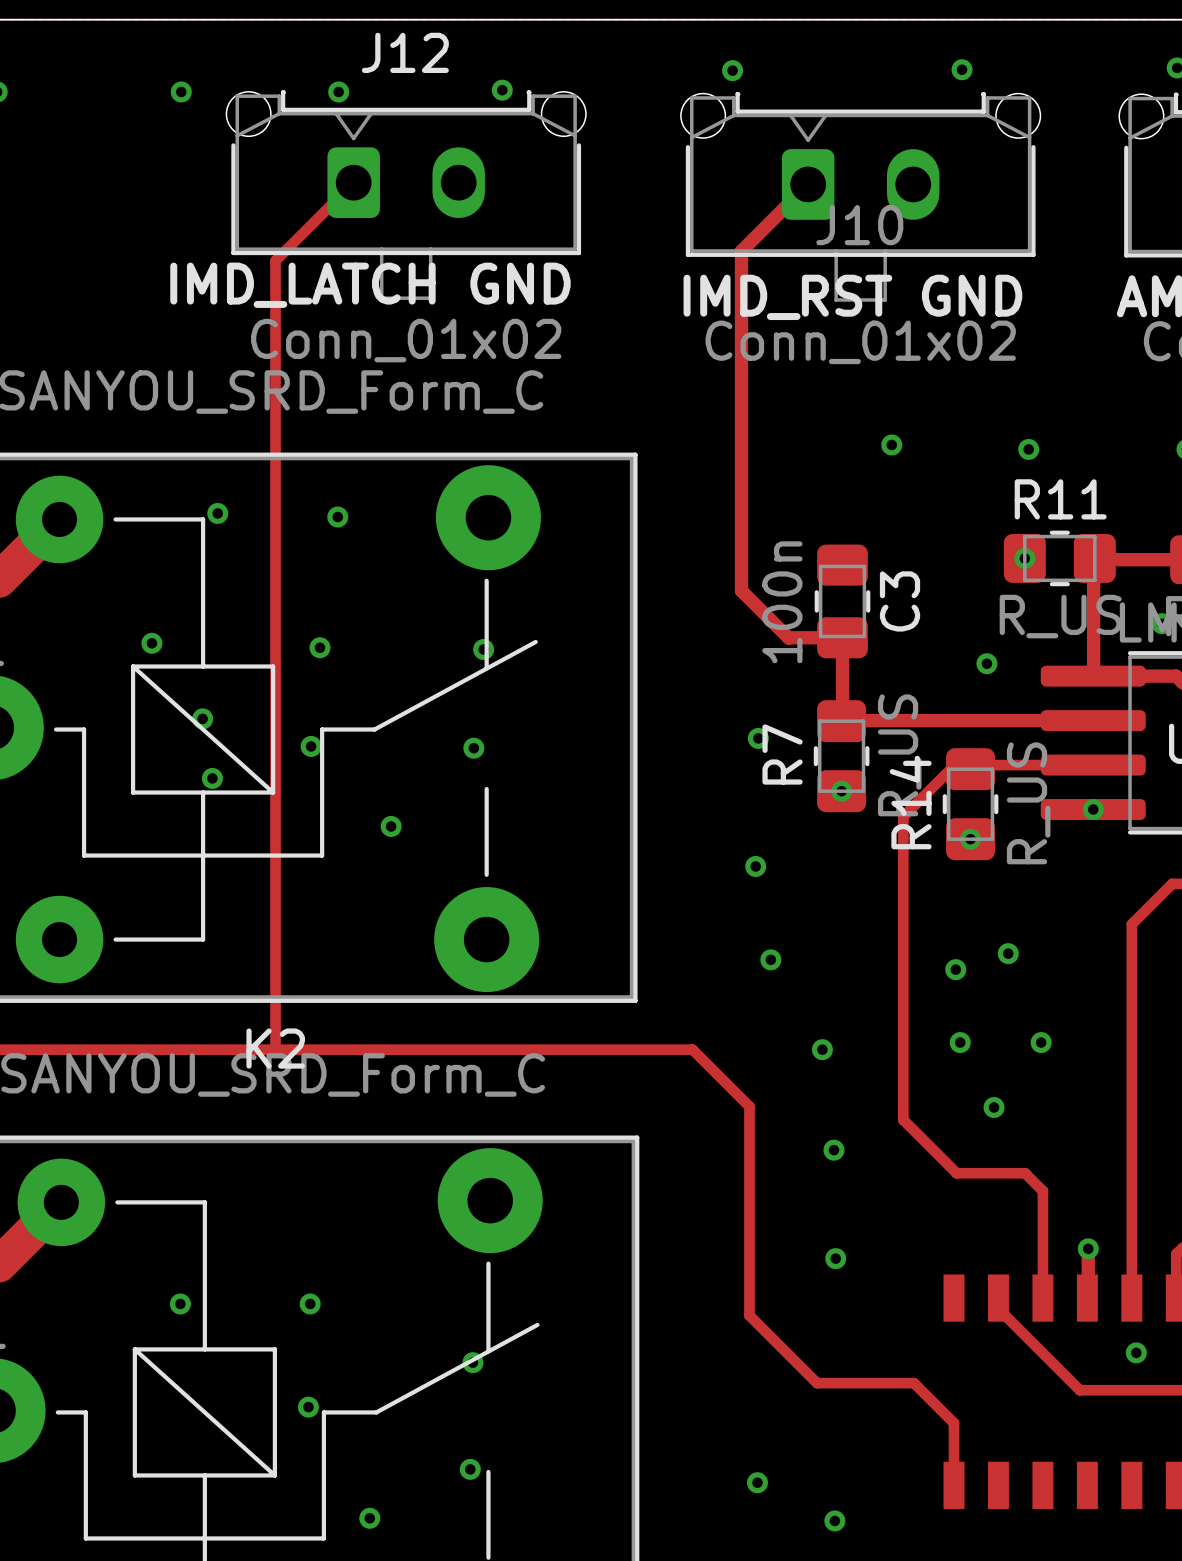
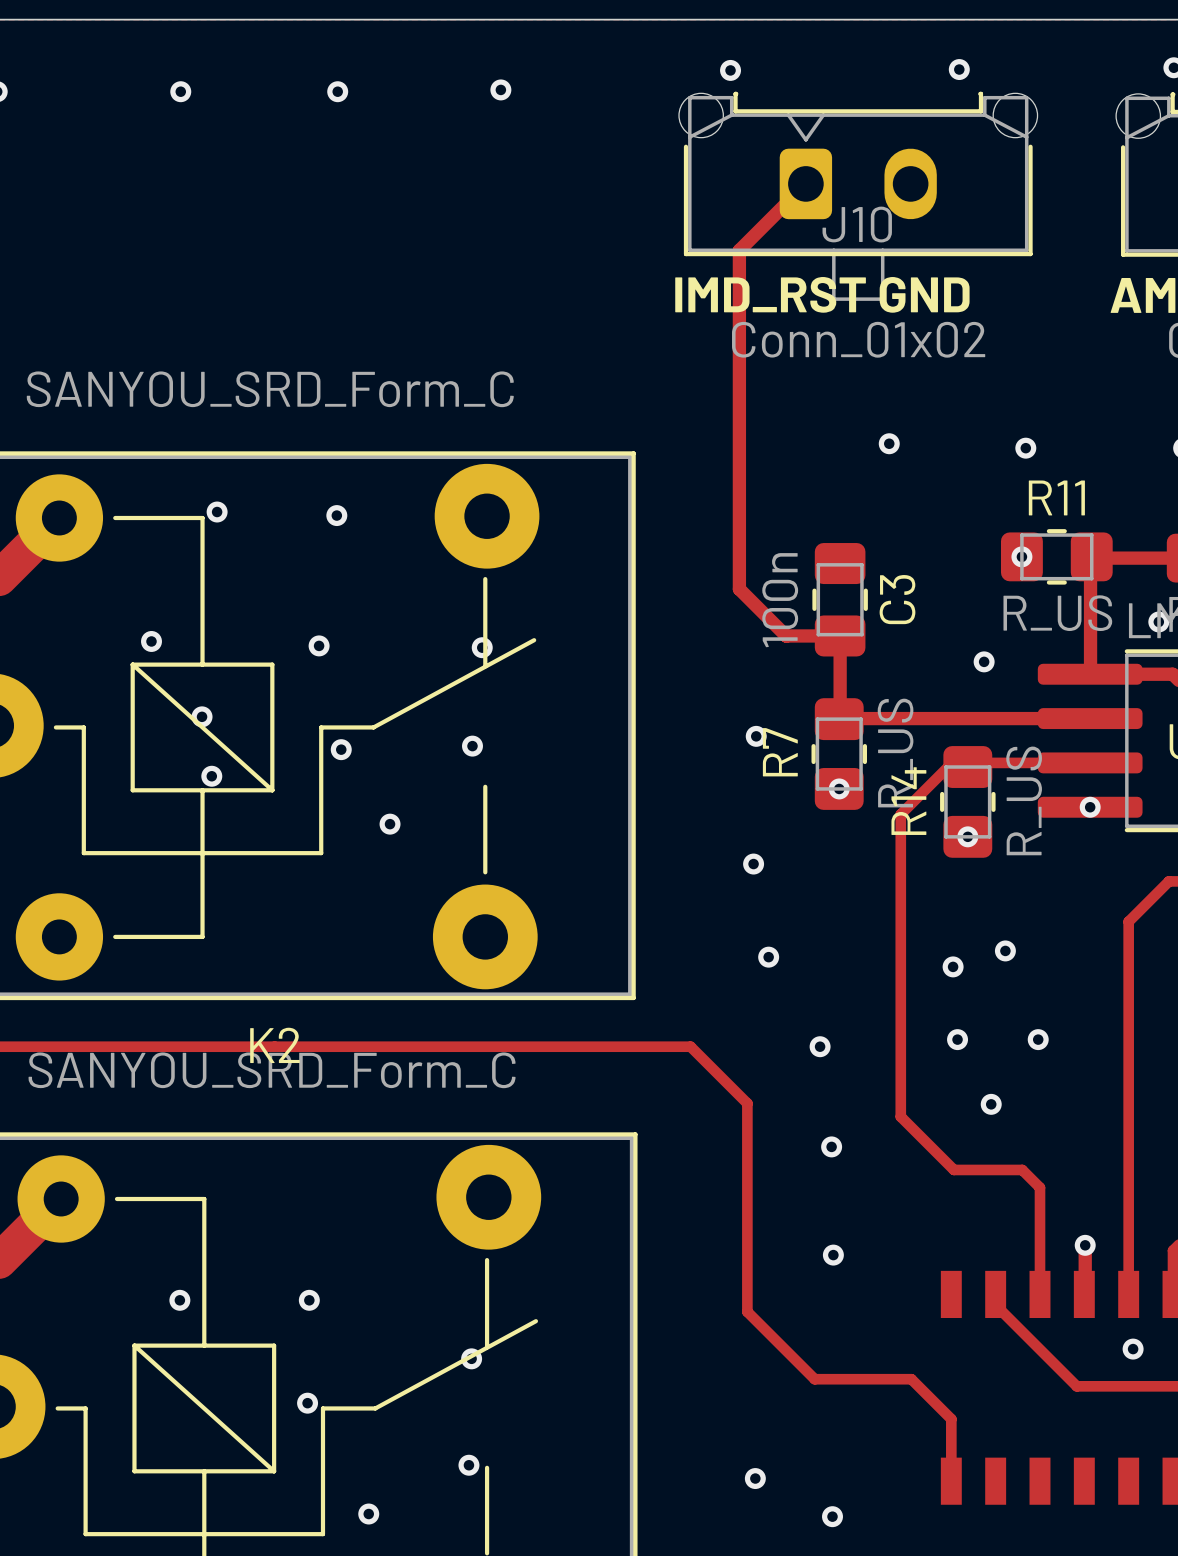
track: (353, 182) (275, 260) (275, 1049) -> none
J12: Conn_01x02 (406, 195) -> none
text: IMD_LATCH GND (370, 285) -> none
via position: (311, 746) -> (341, 749)

